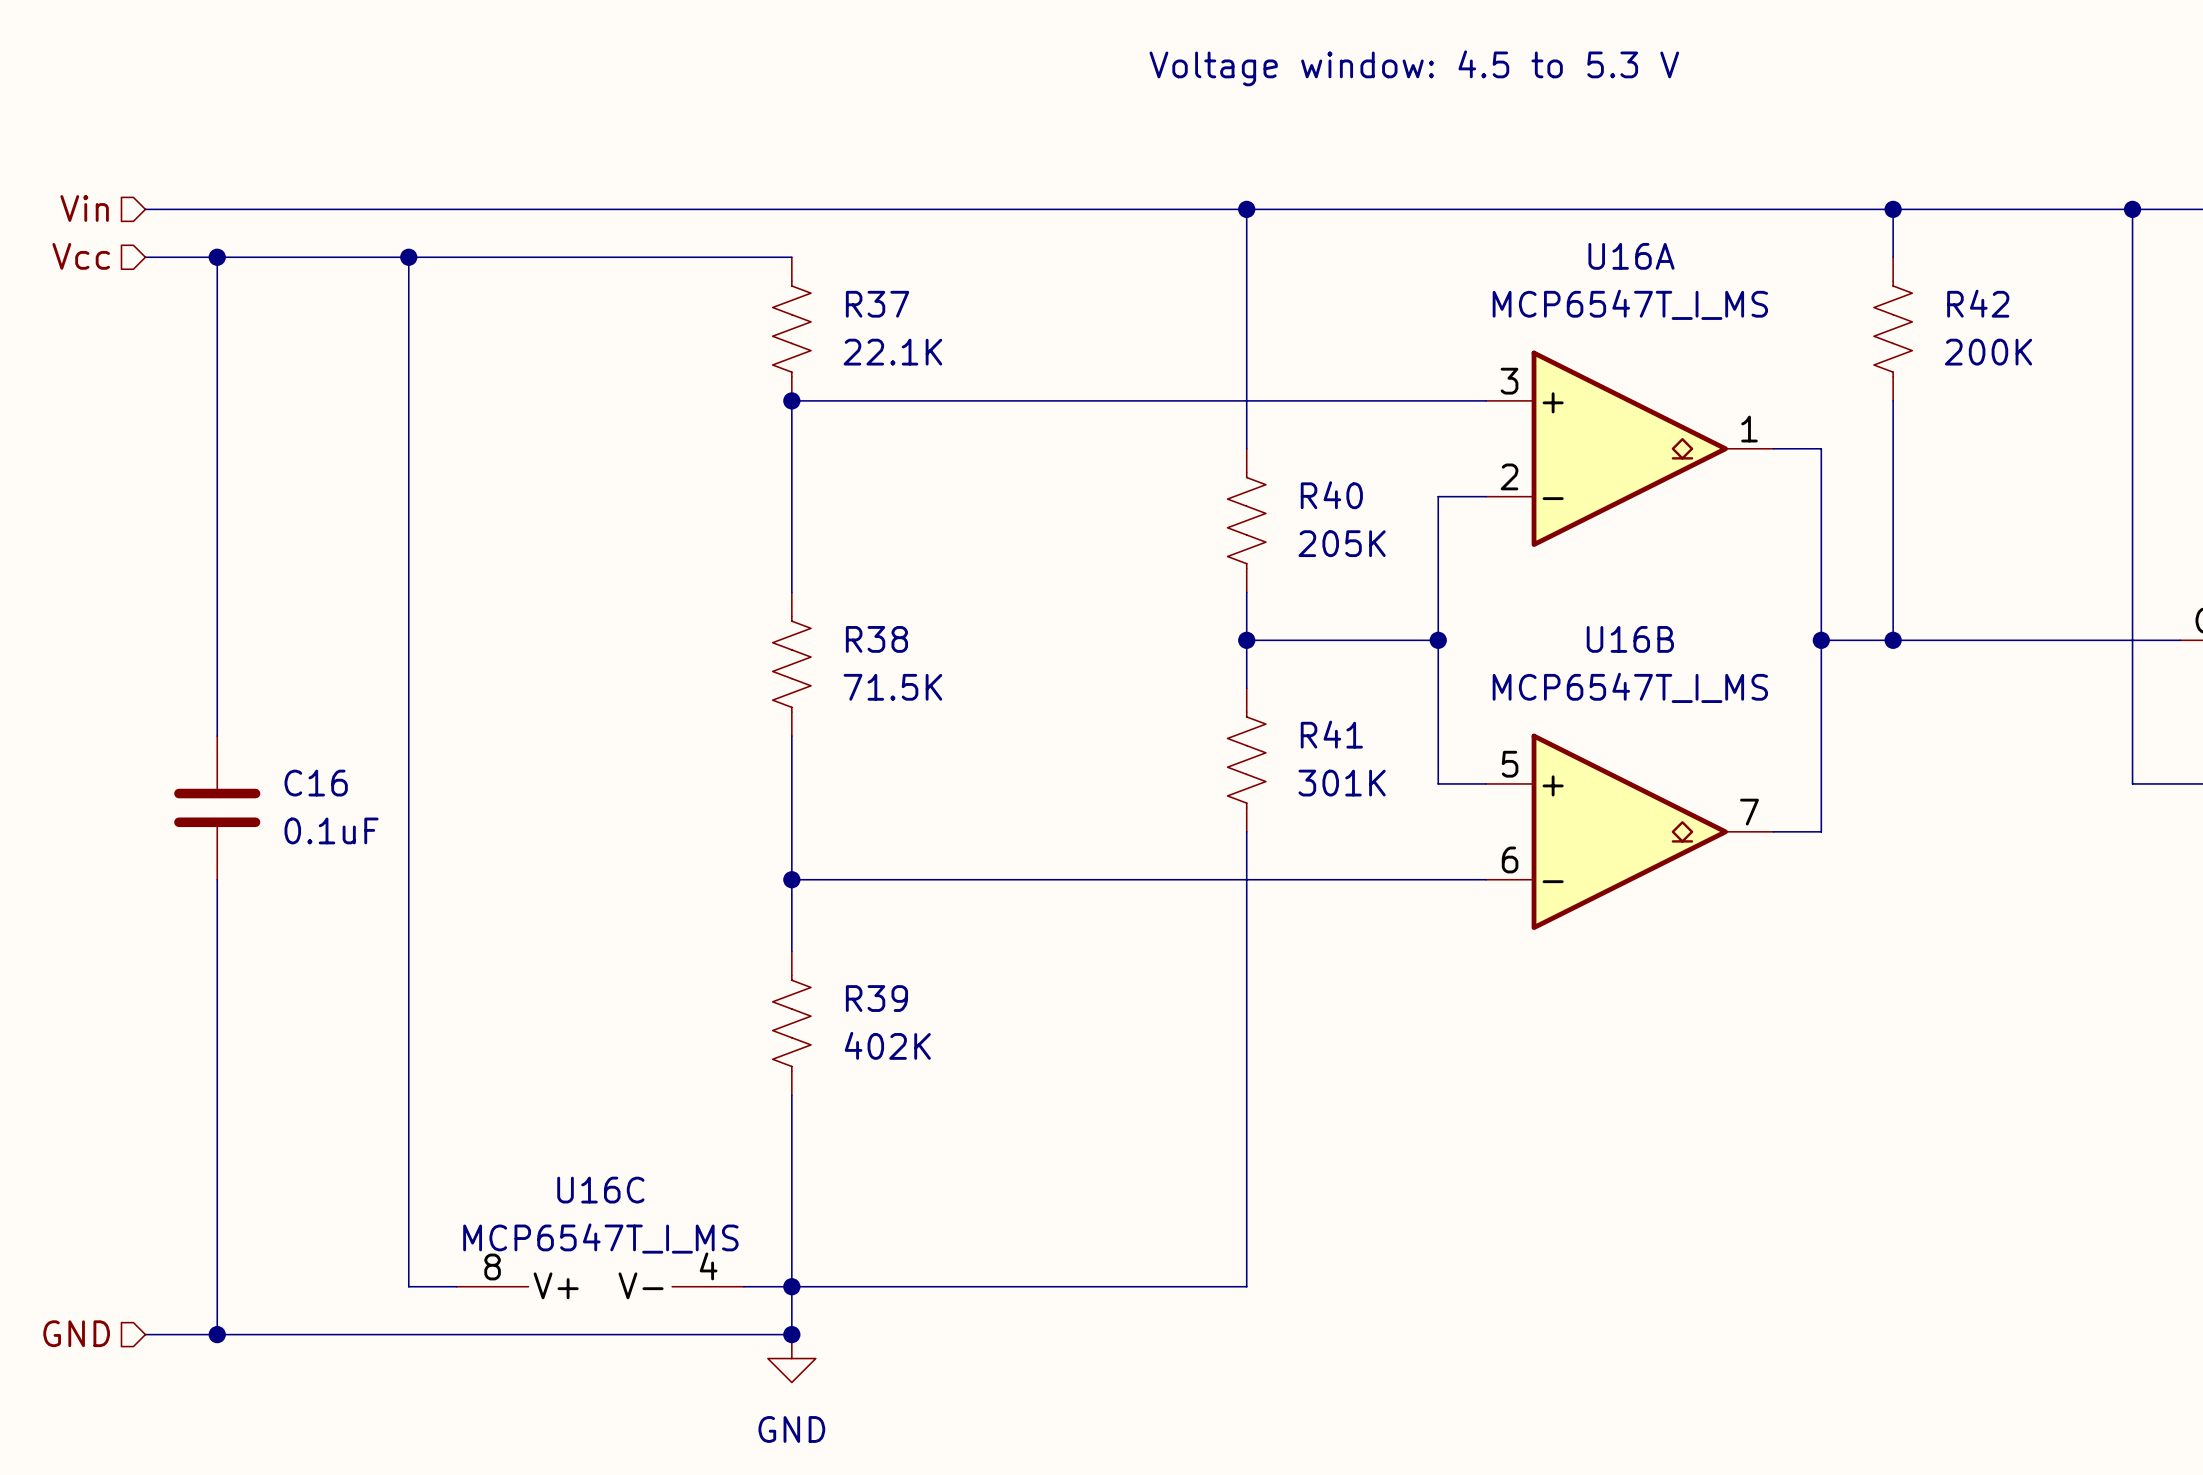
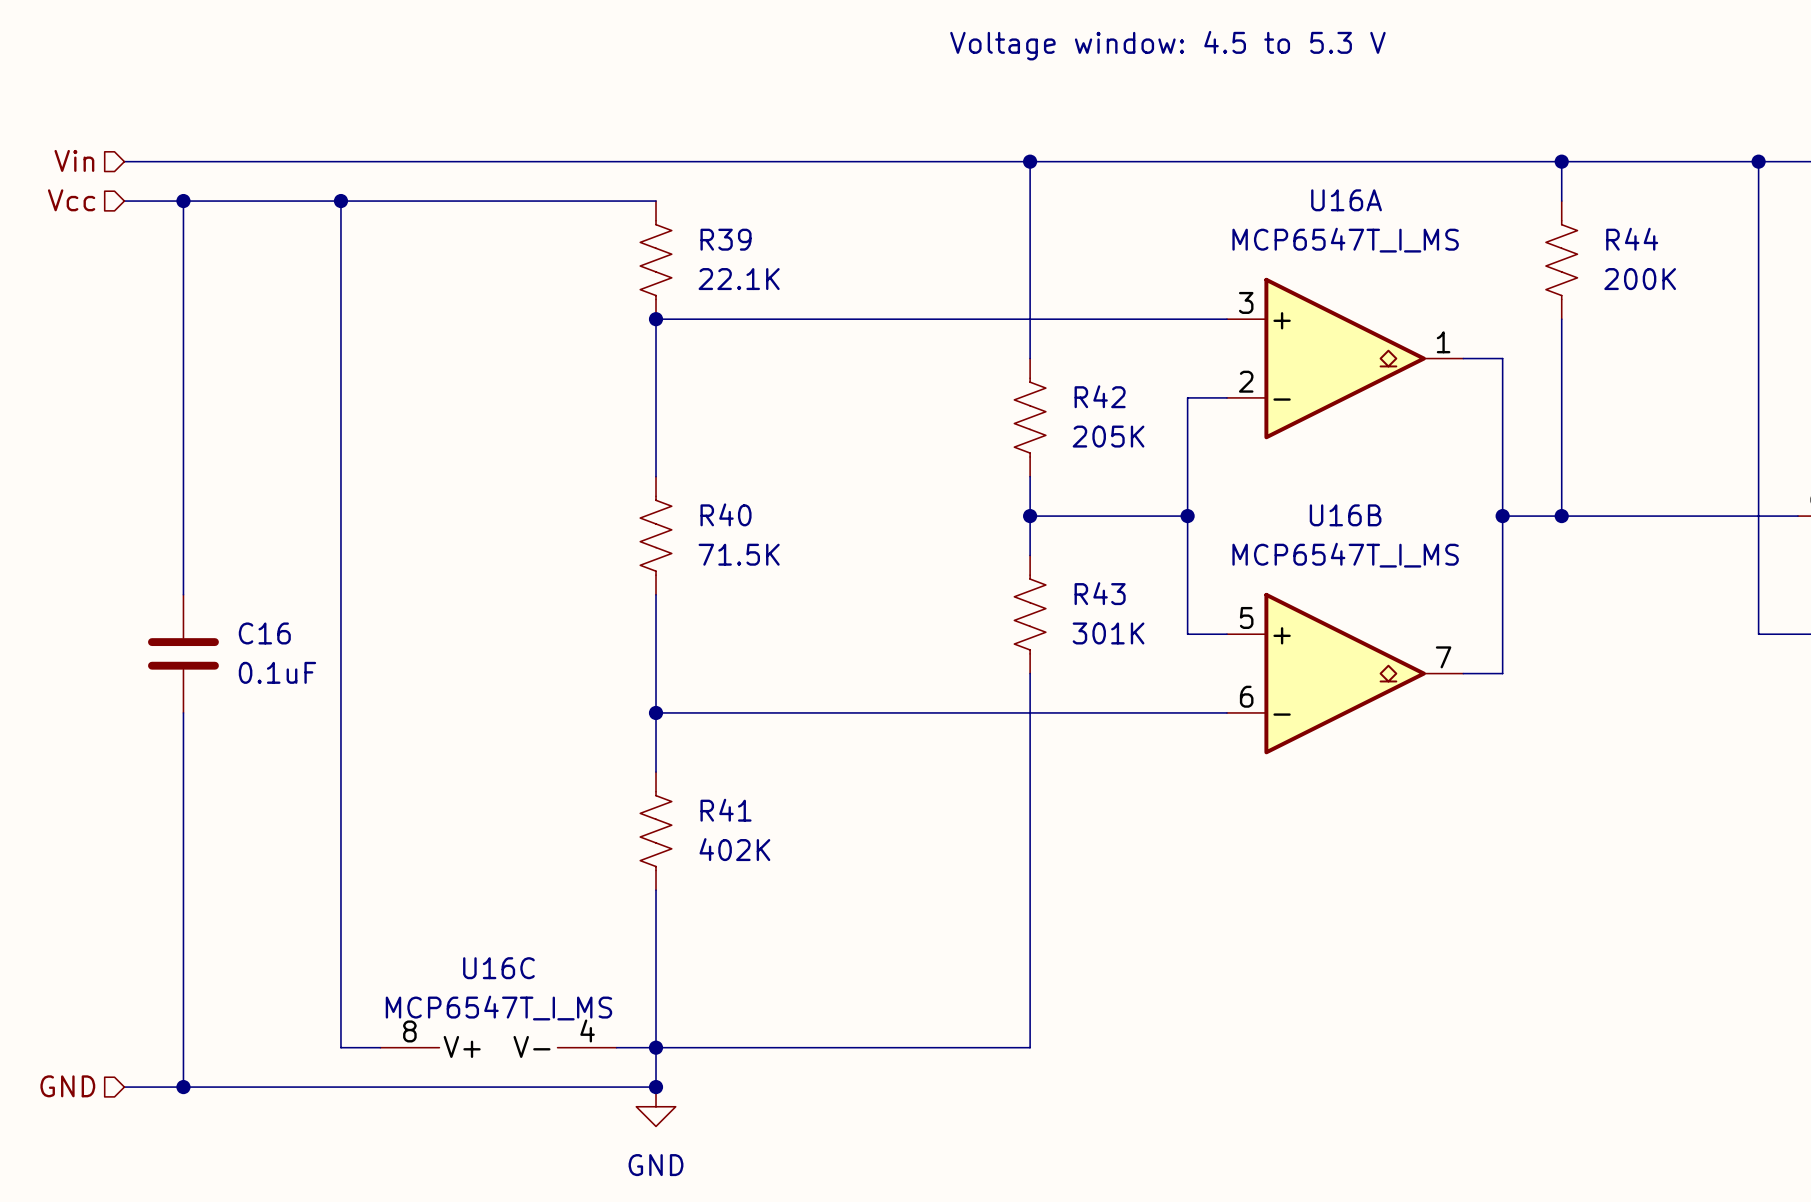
R42 name: R42 (1978, 303) -> R44 (1632, 239)
R37 name: R37 (877, 304) -> R39 (726, 239)
R40 name: R40 (1331, 495) -> R42 (1100, 396)
R38 name: R38 (876, 639) -> R40 (726, 514)
R41 name: R41 (1331, 734) -> R43 (1100, 593)
R39 name: R39 (876, 998) -> R41 (726, 810)

